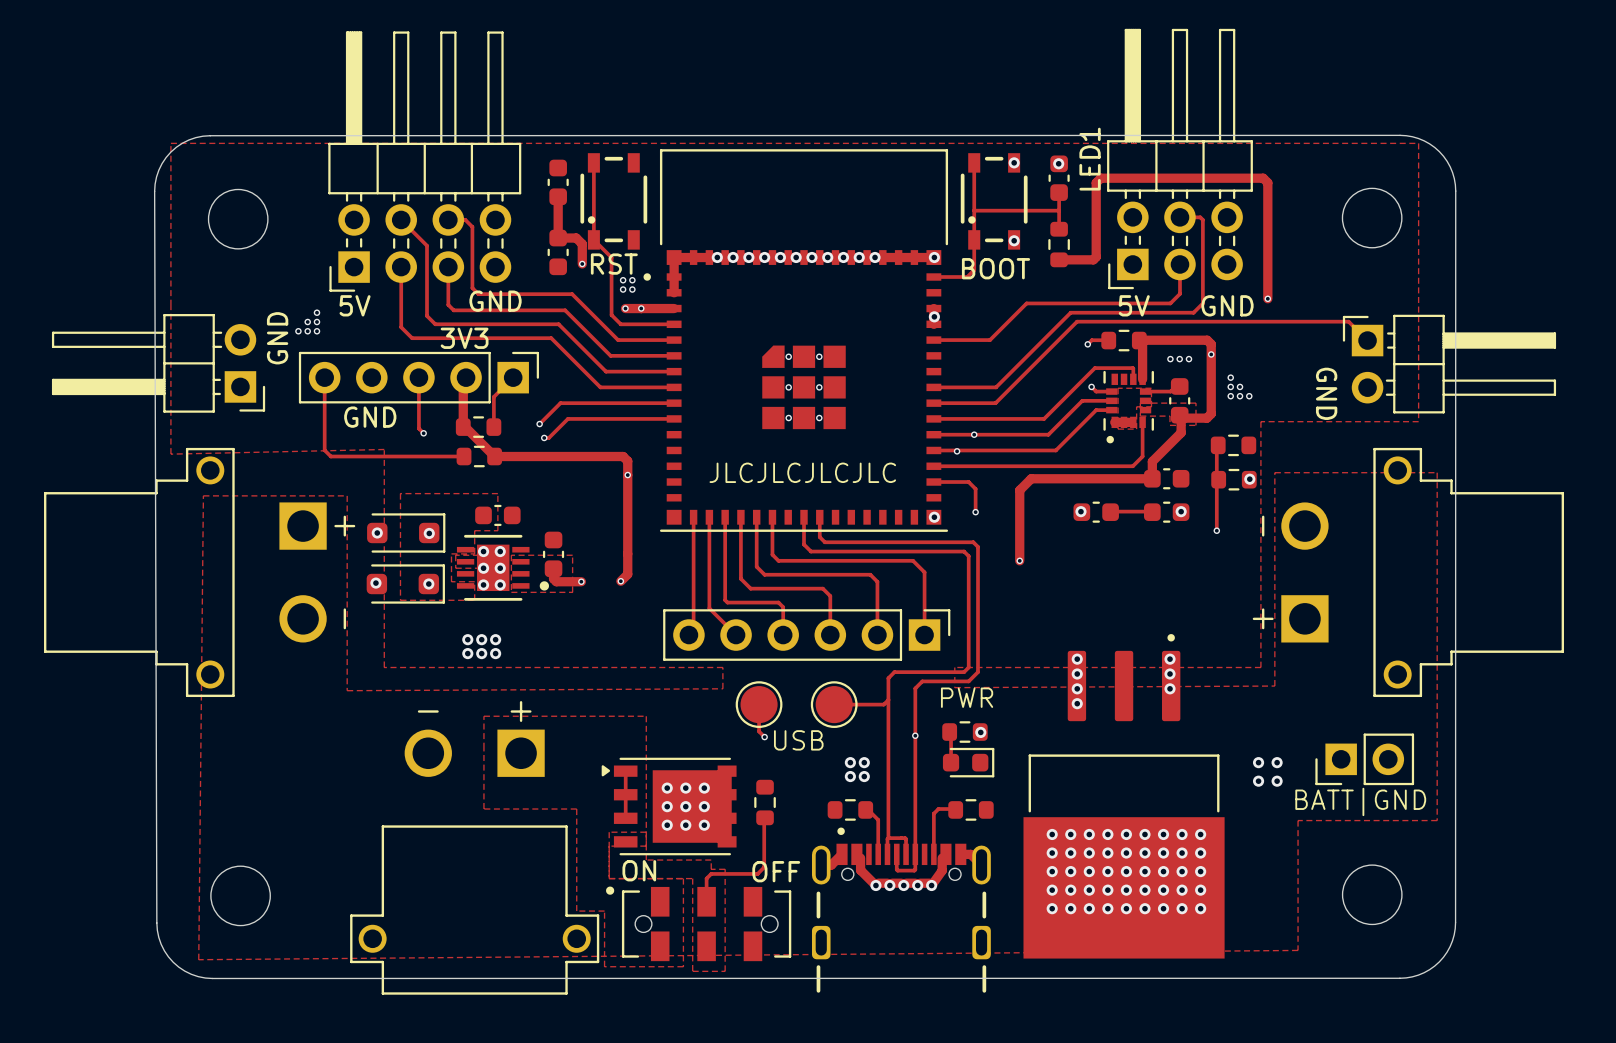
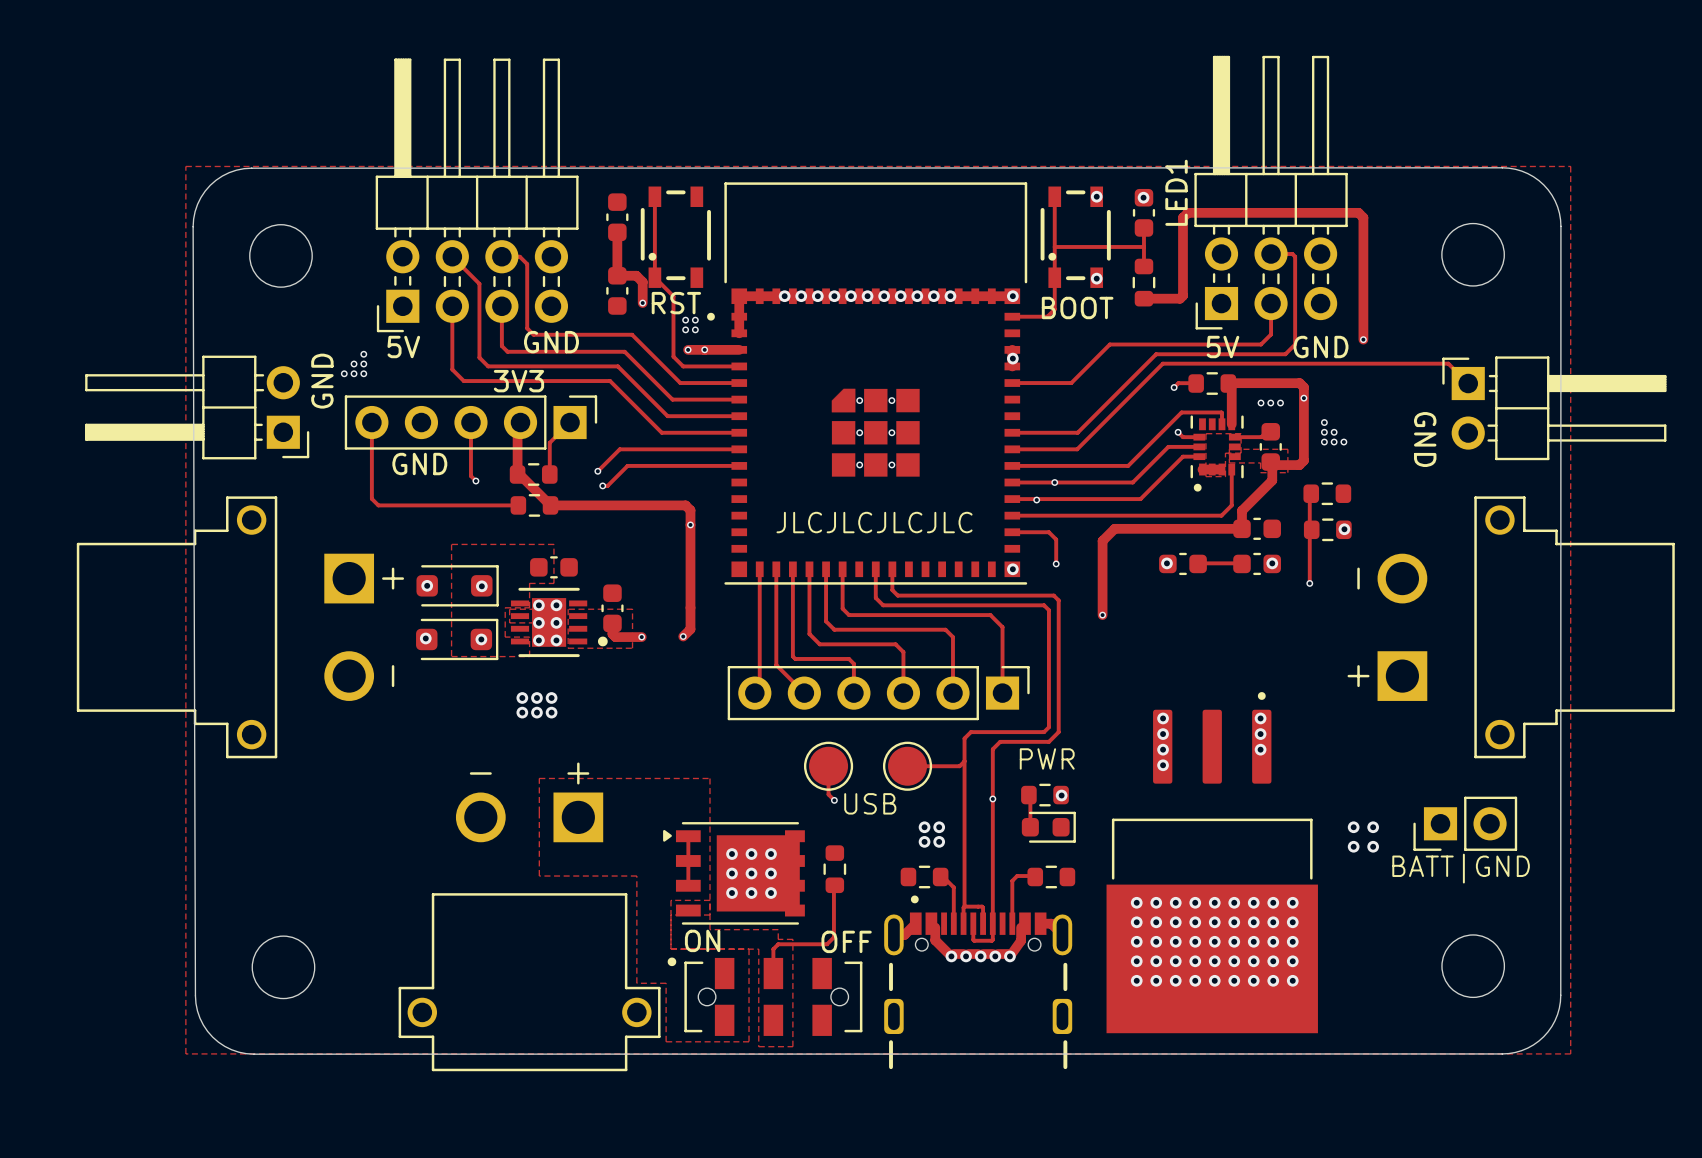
zone outline: (170, 143) (170, 454) (384, 449) (384, 667) (722, 667) (722, 688) (347, 690) (347, 495) (203, 495) (198, 959) (1298, 950) (1298, 820) (1437, 820) (1437, 472) (1274, 472) (1274, 686) (954, 687) (954, 667) (1260, 667) (1260, 421) (1418, 421) (1418, 143) (170, 143) -> (185, 166) (185, 1053) (1570, 1053) (1570, 166) (185, 166)

